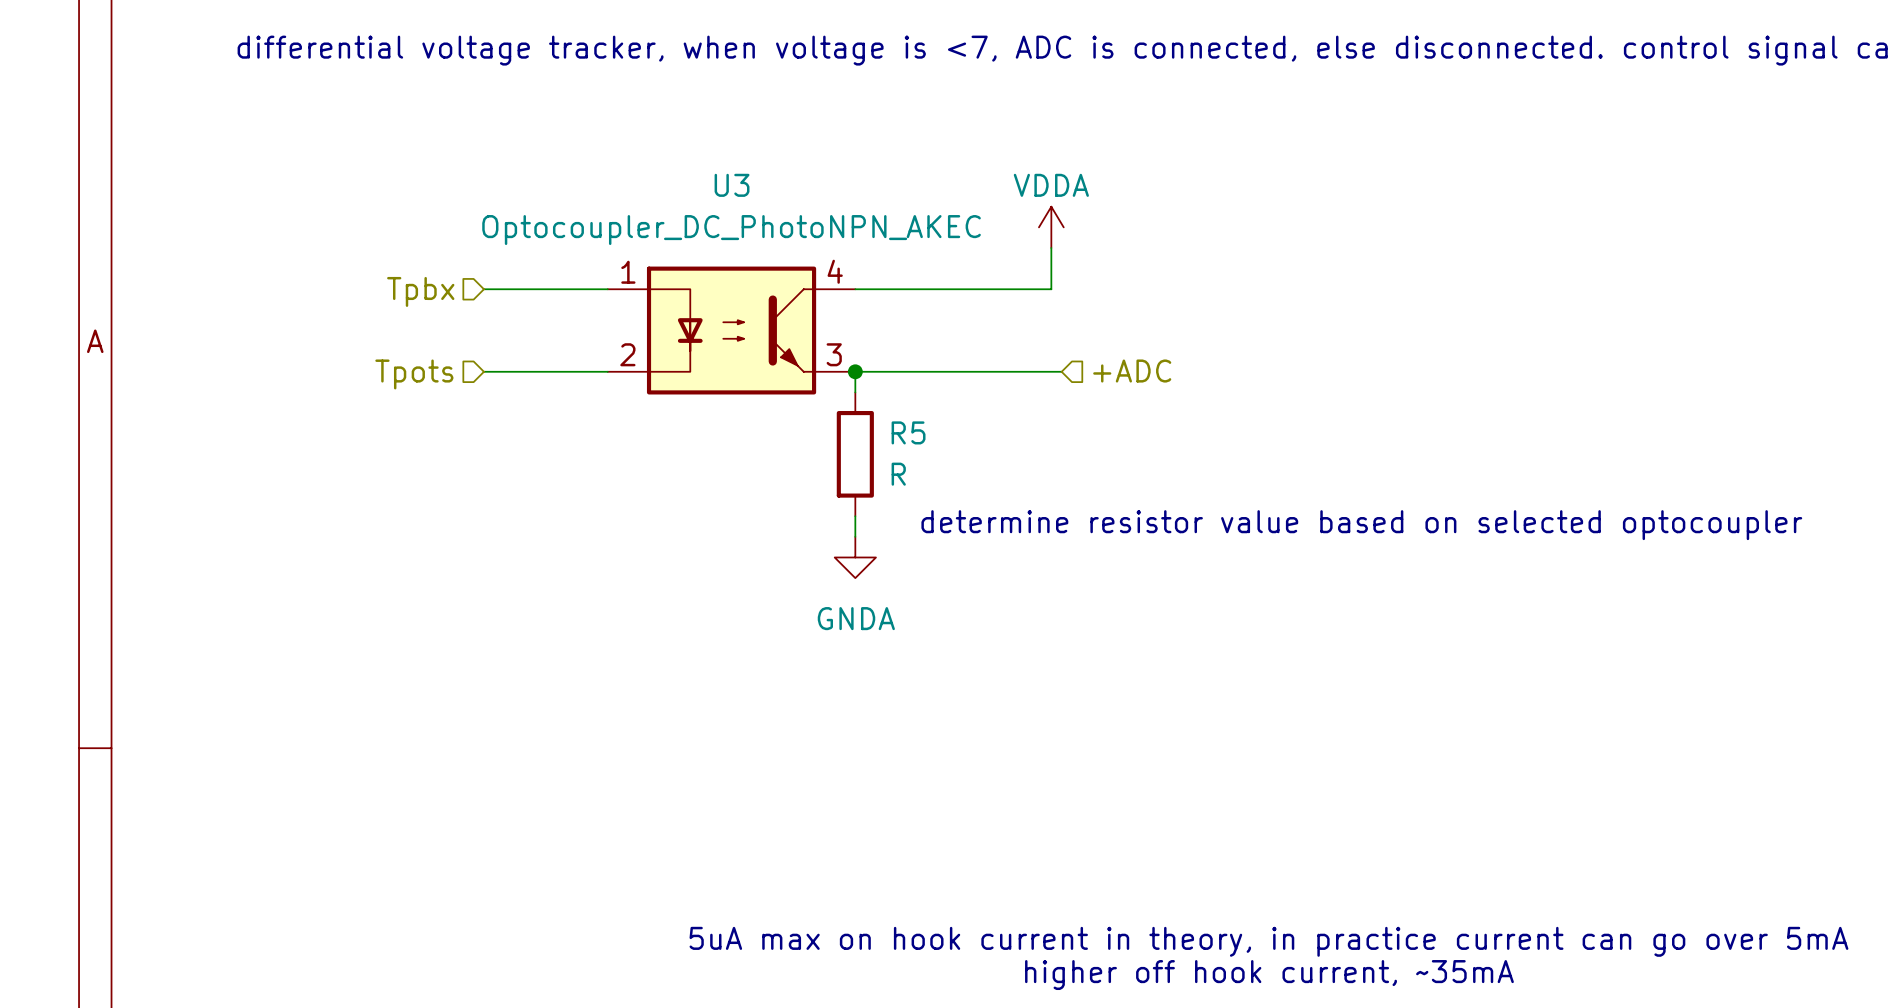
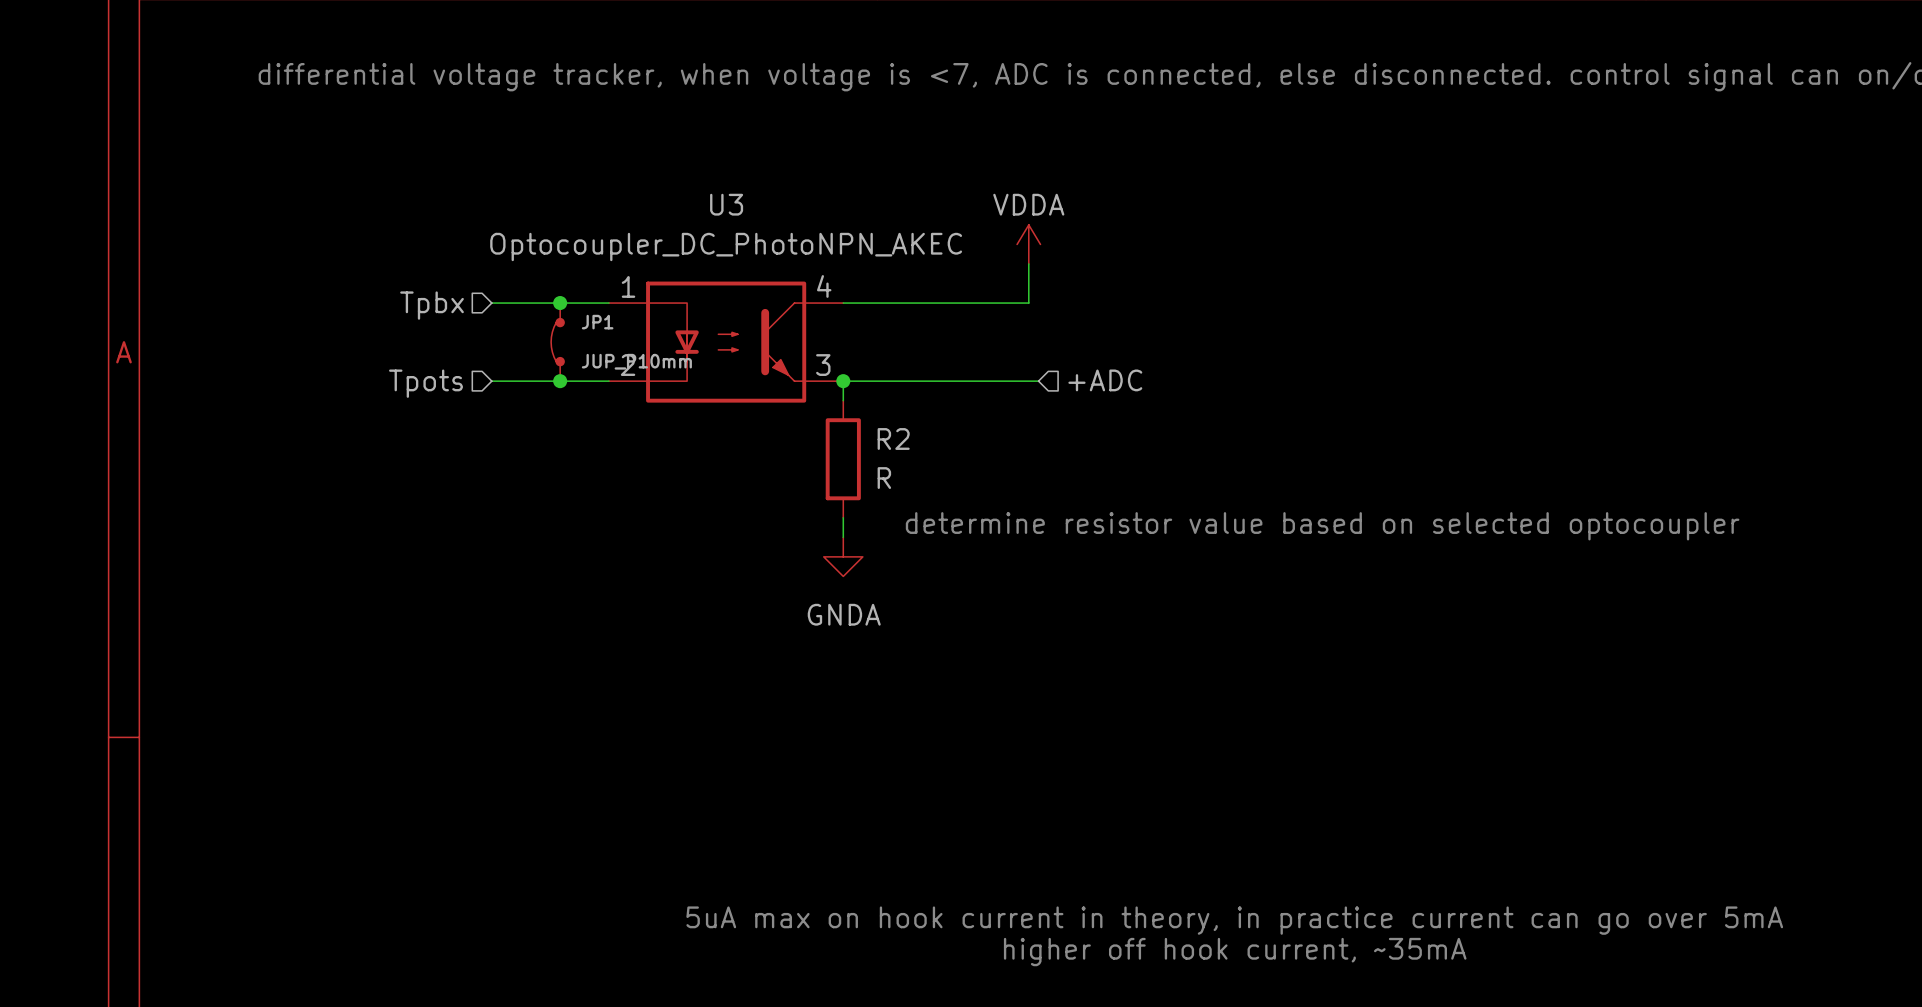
junction: none -> (560, 303)
JP1: none -> JUP_P10mm (557, 342)
junction: none -> (560, 381)
R5 name: R5 (908, 432) -> R2 (893, 438)

